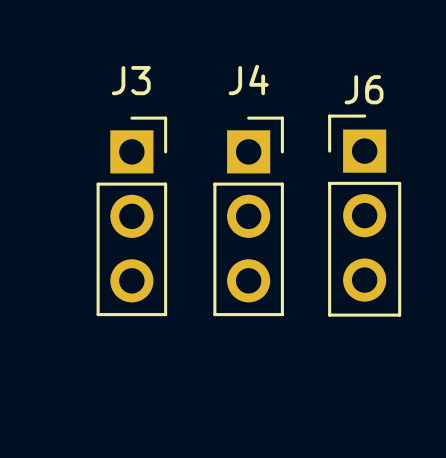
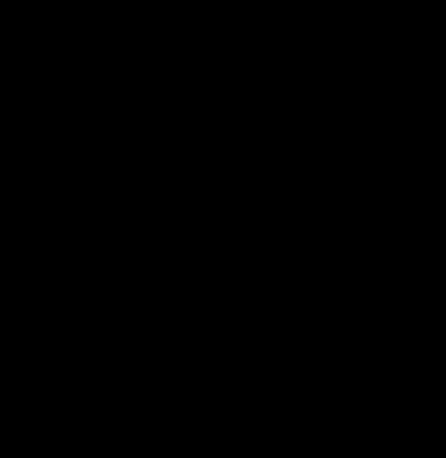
J6: (364, 215) -> none
J3: (131, 216) -> none
J4: (248, 216) -> none

